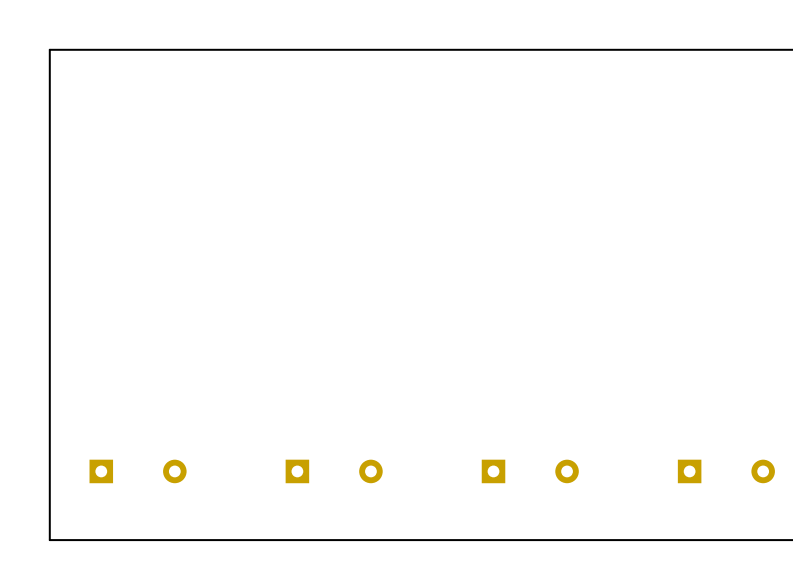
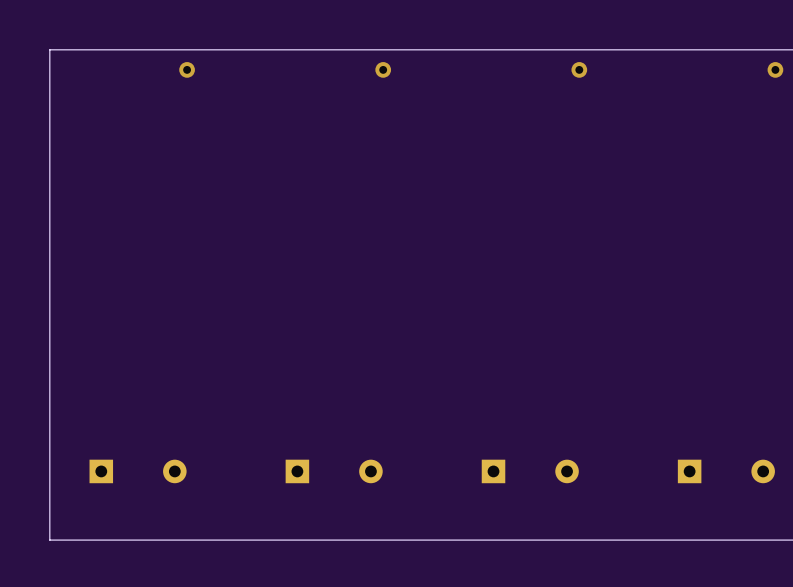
via: none -> (187, 69)
via: none -> (383, 69)
via: none -> (579, 69)
via: none -> (775, 69)

